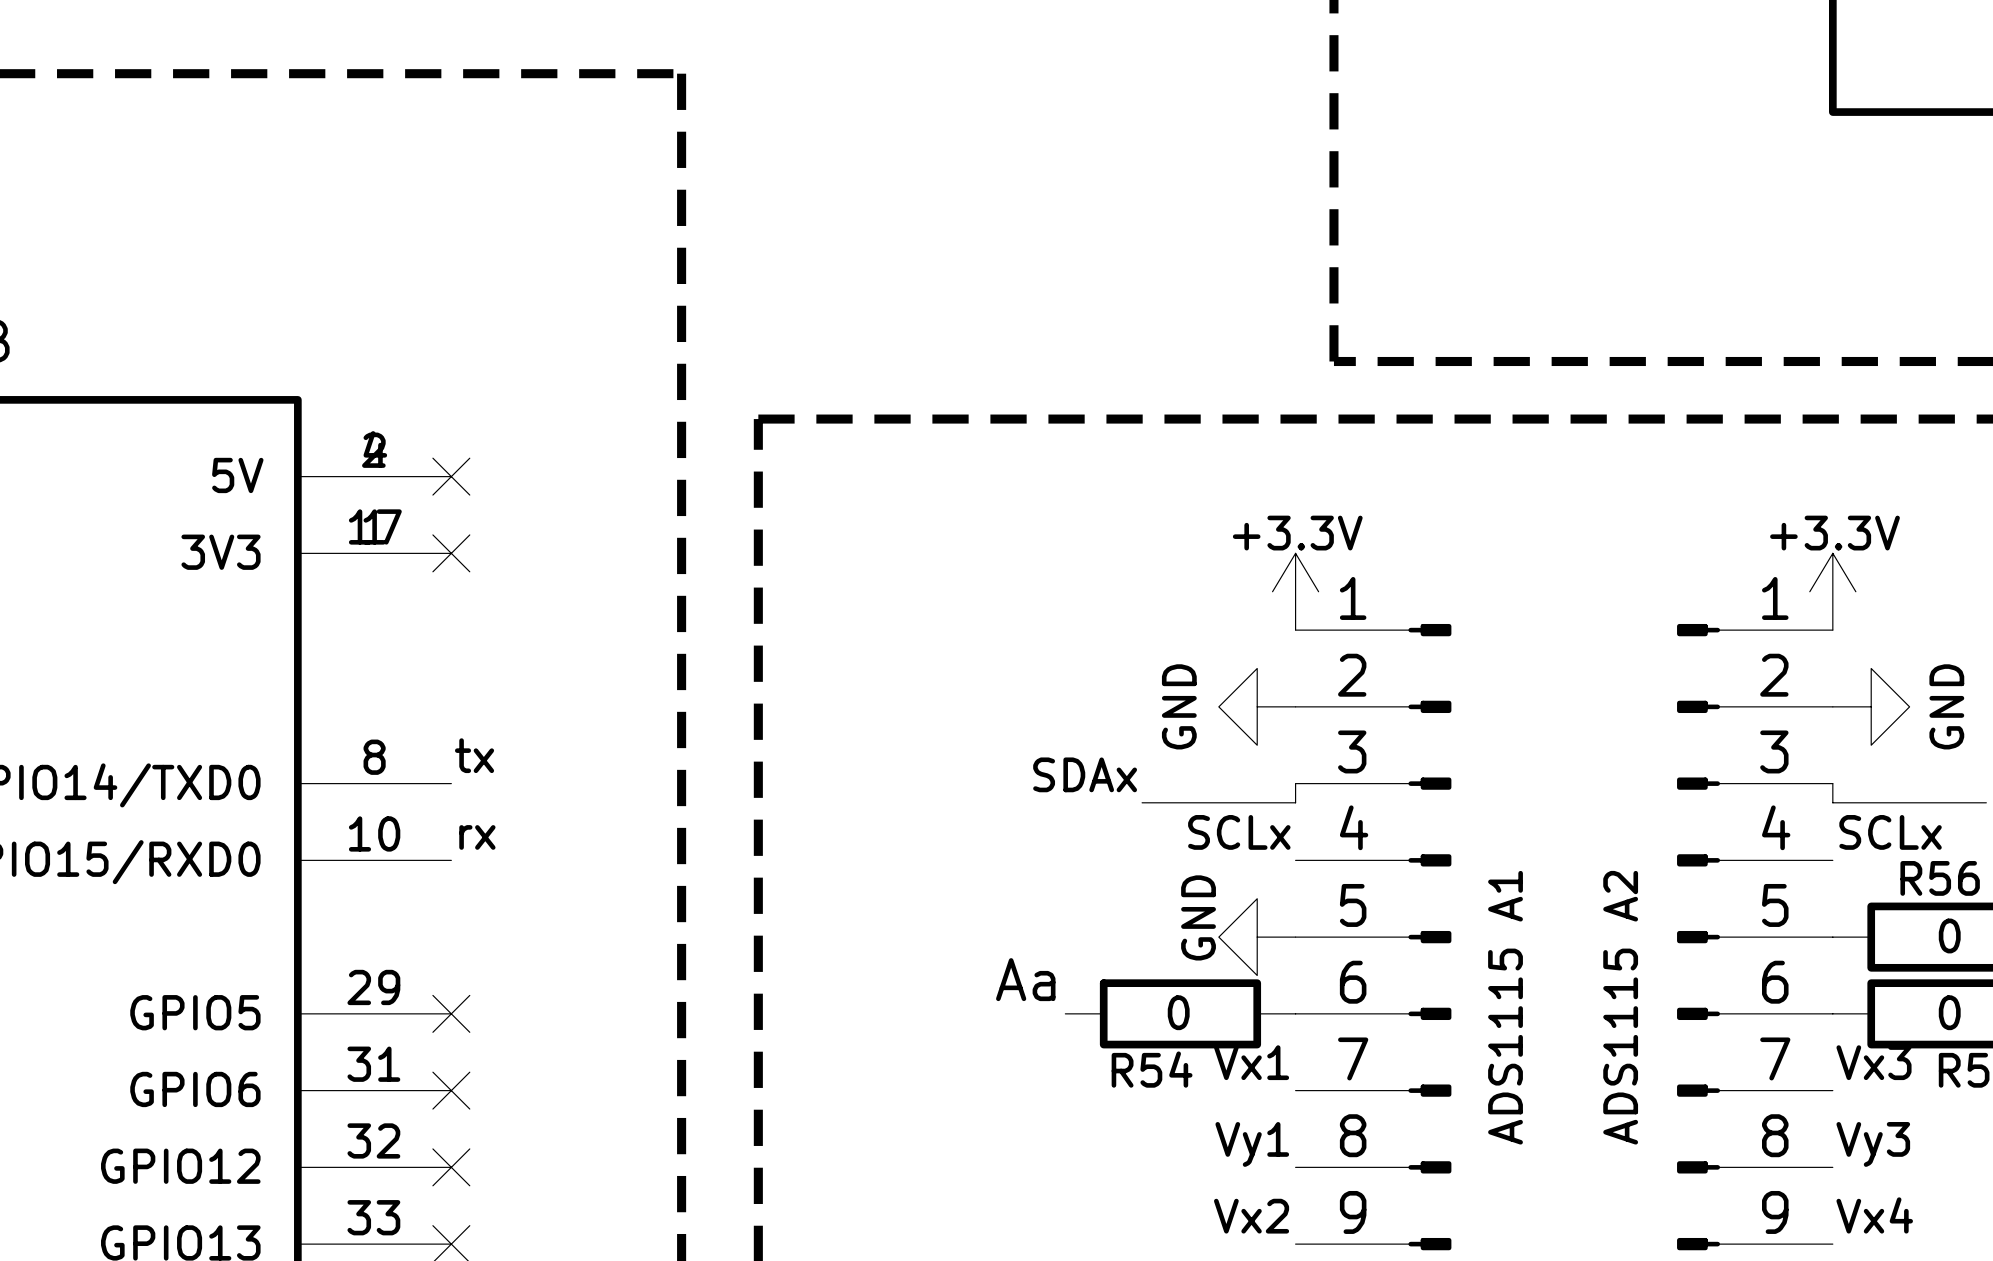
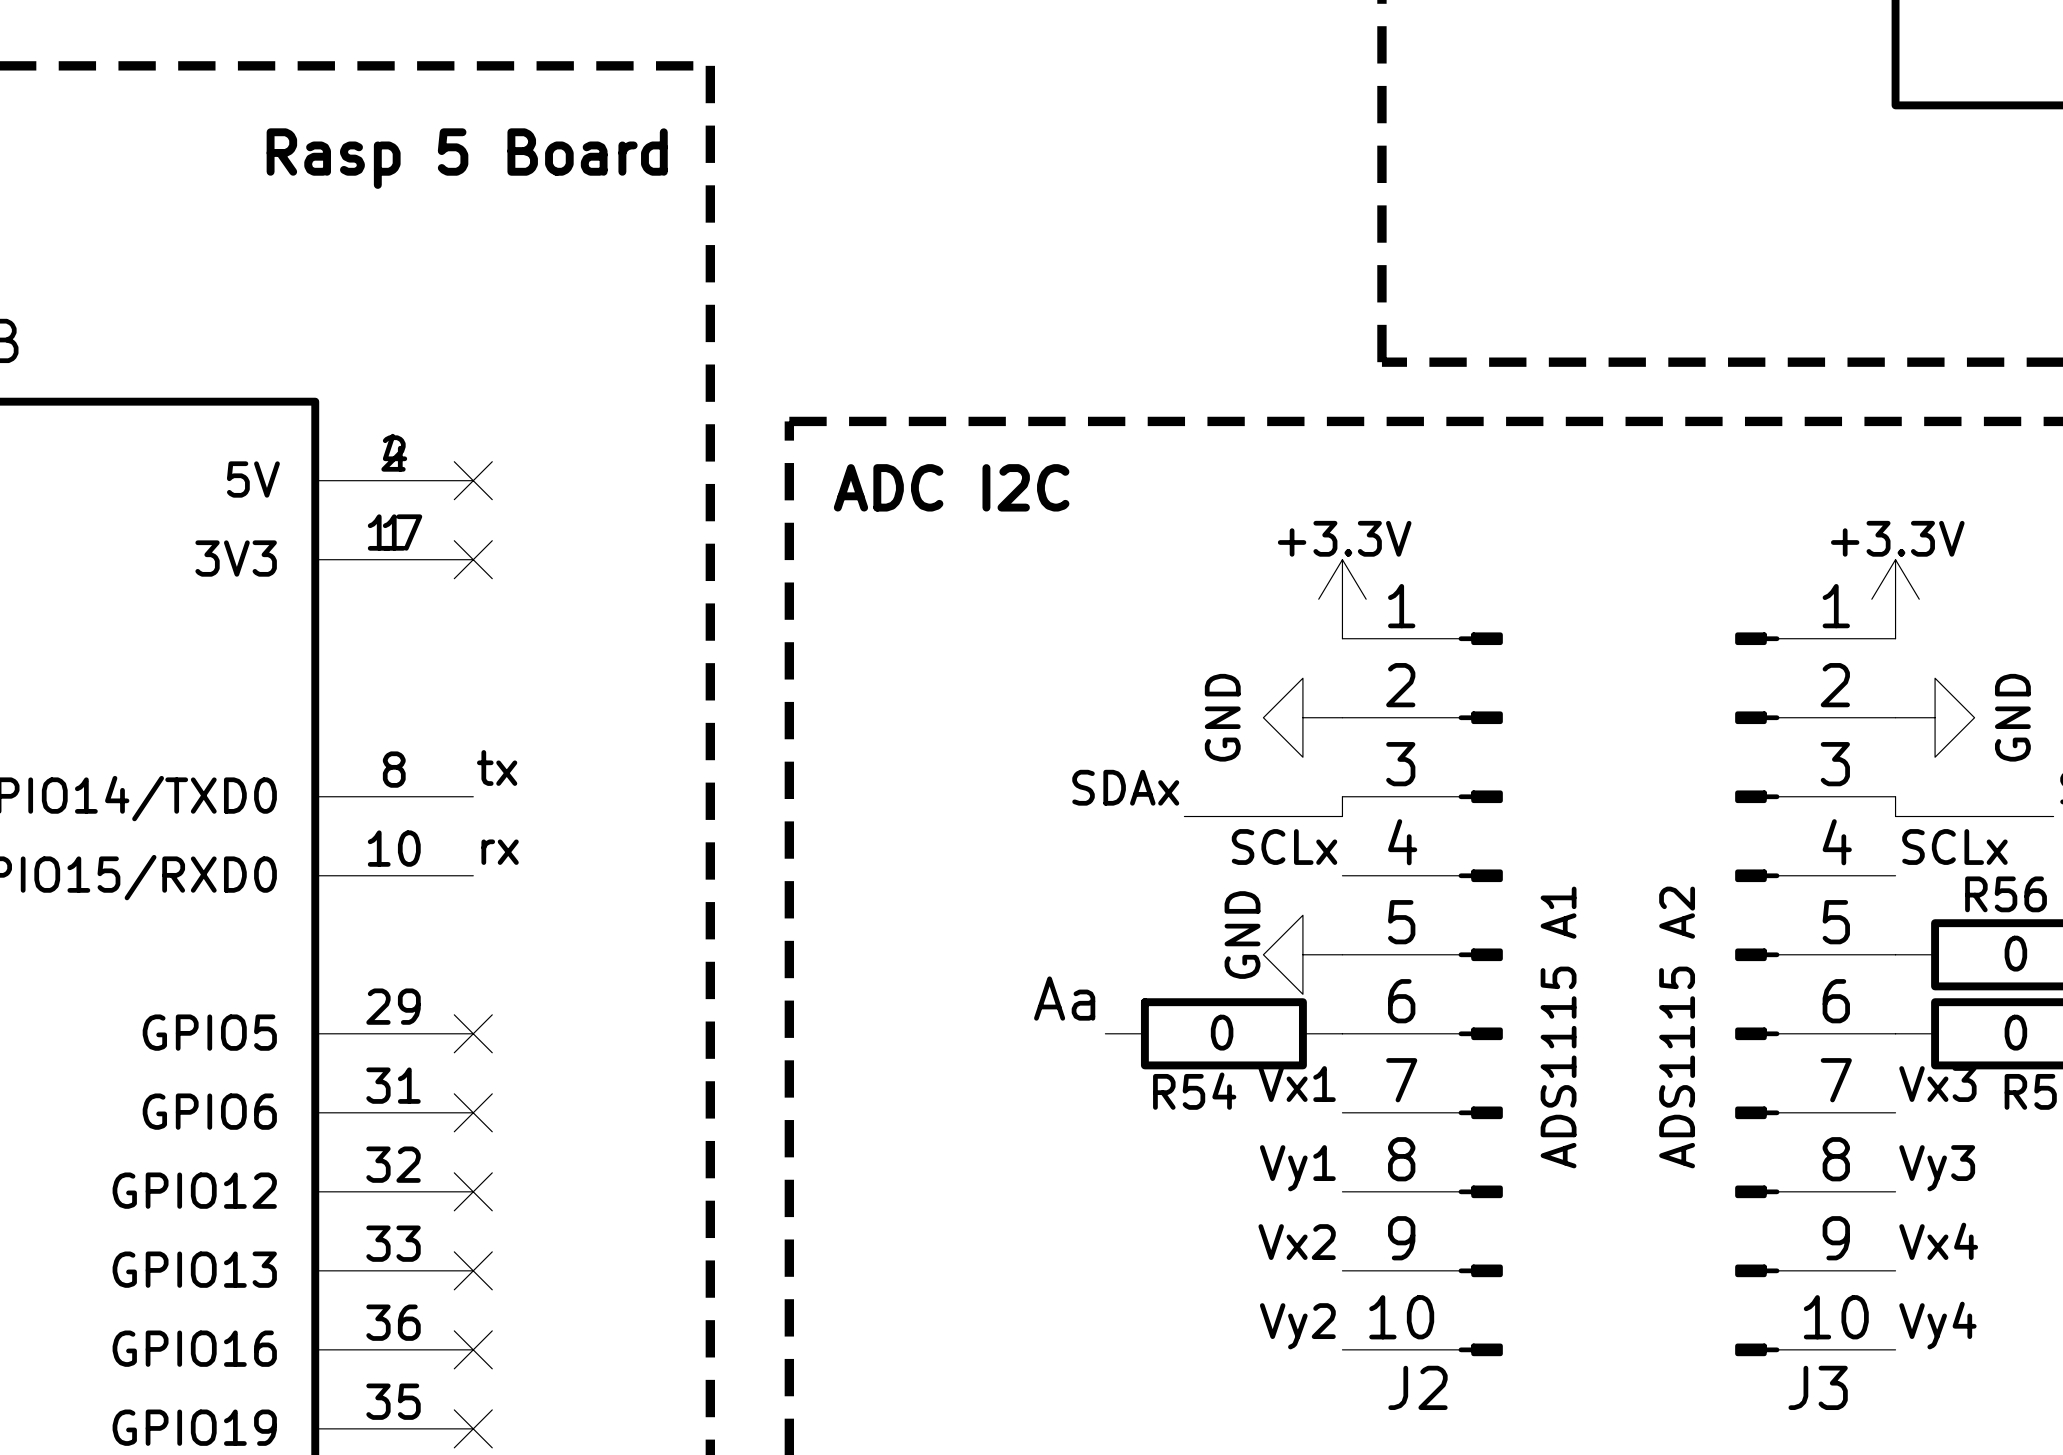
text: none -> Rasp 5 Board (467, 158)
text: none -> ADC I2C (951, 487)

